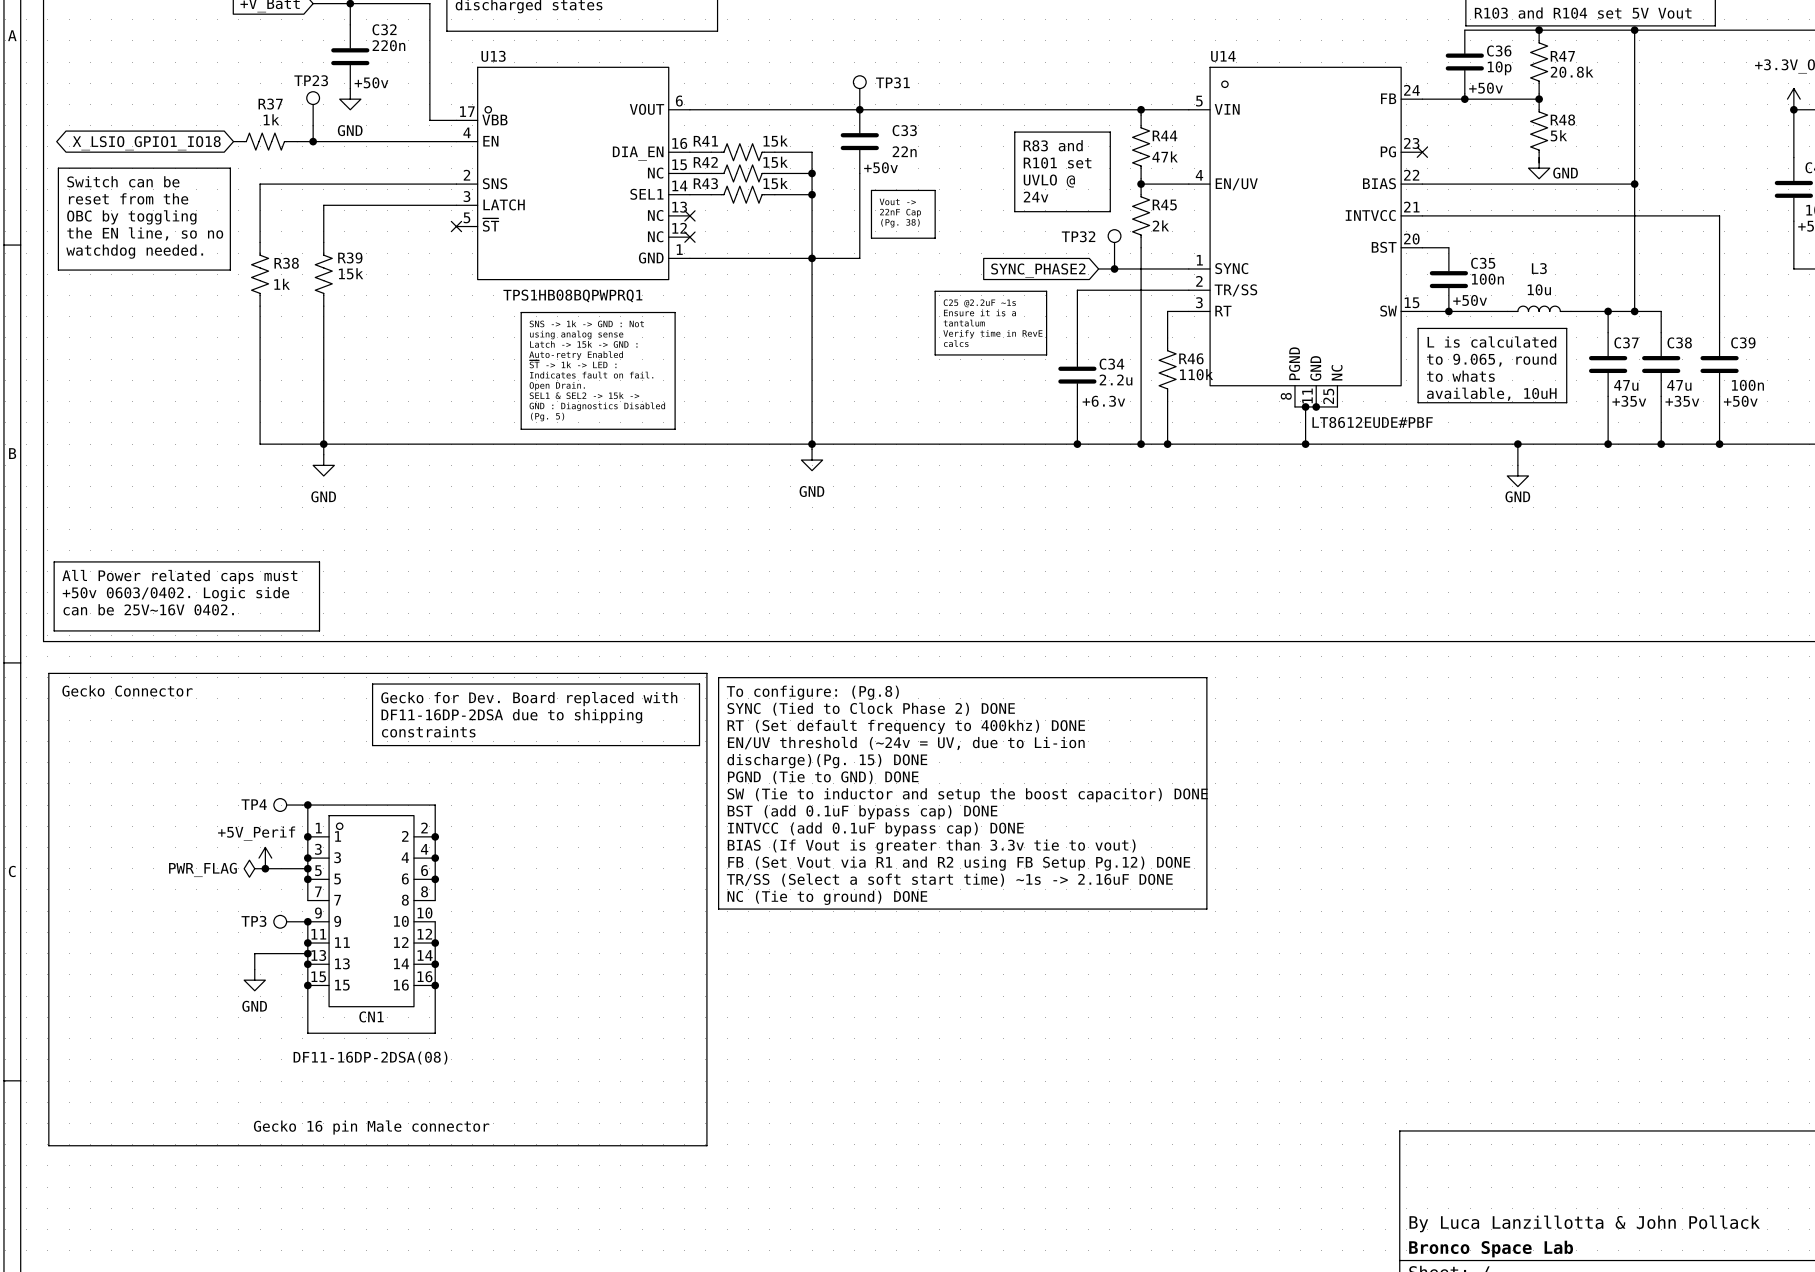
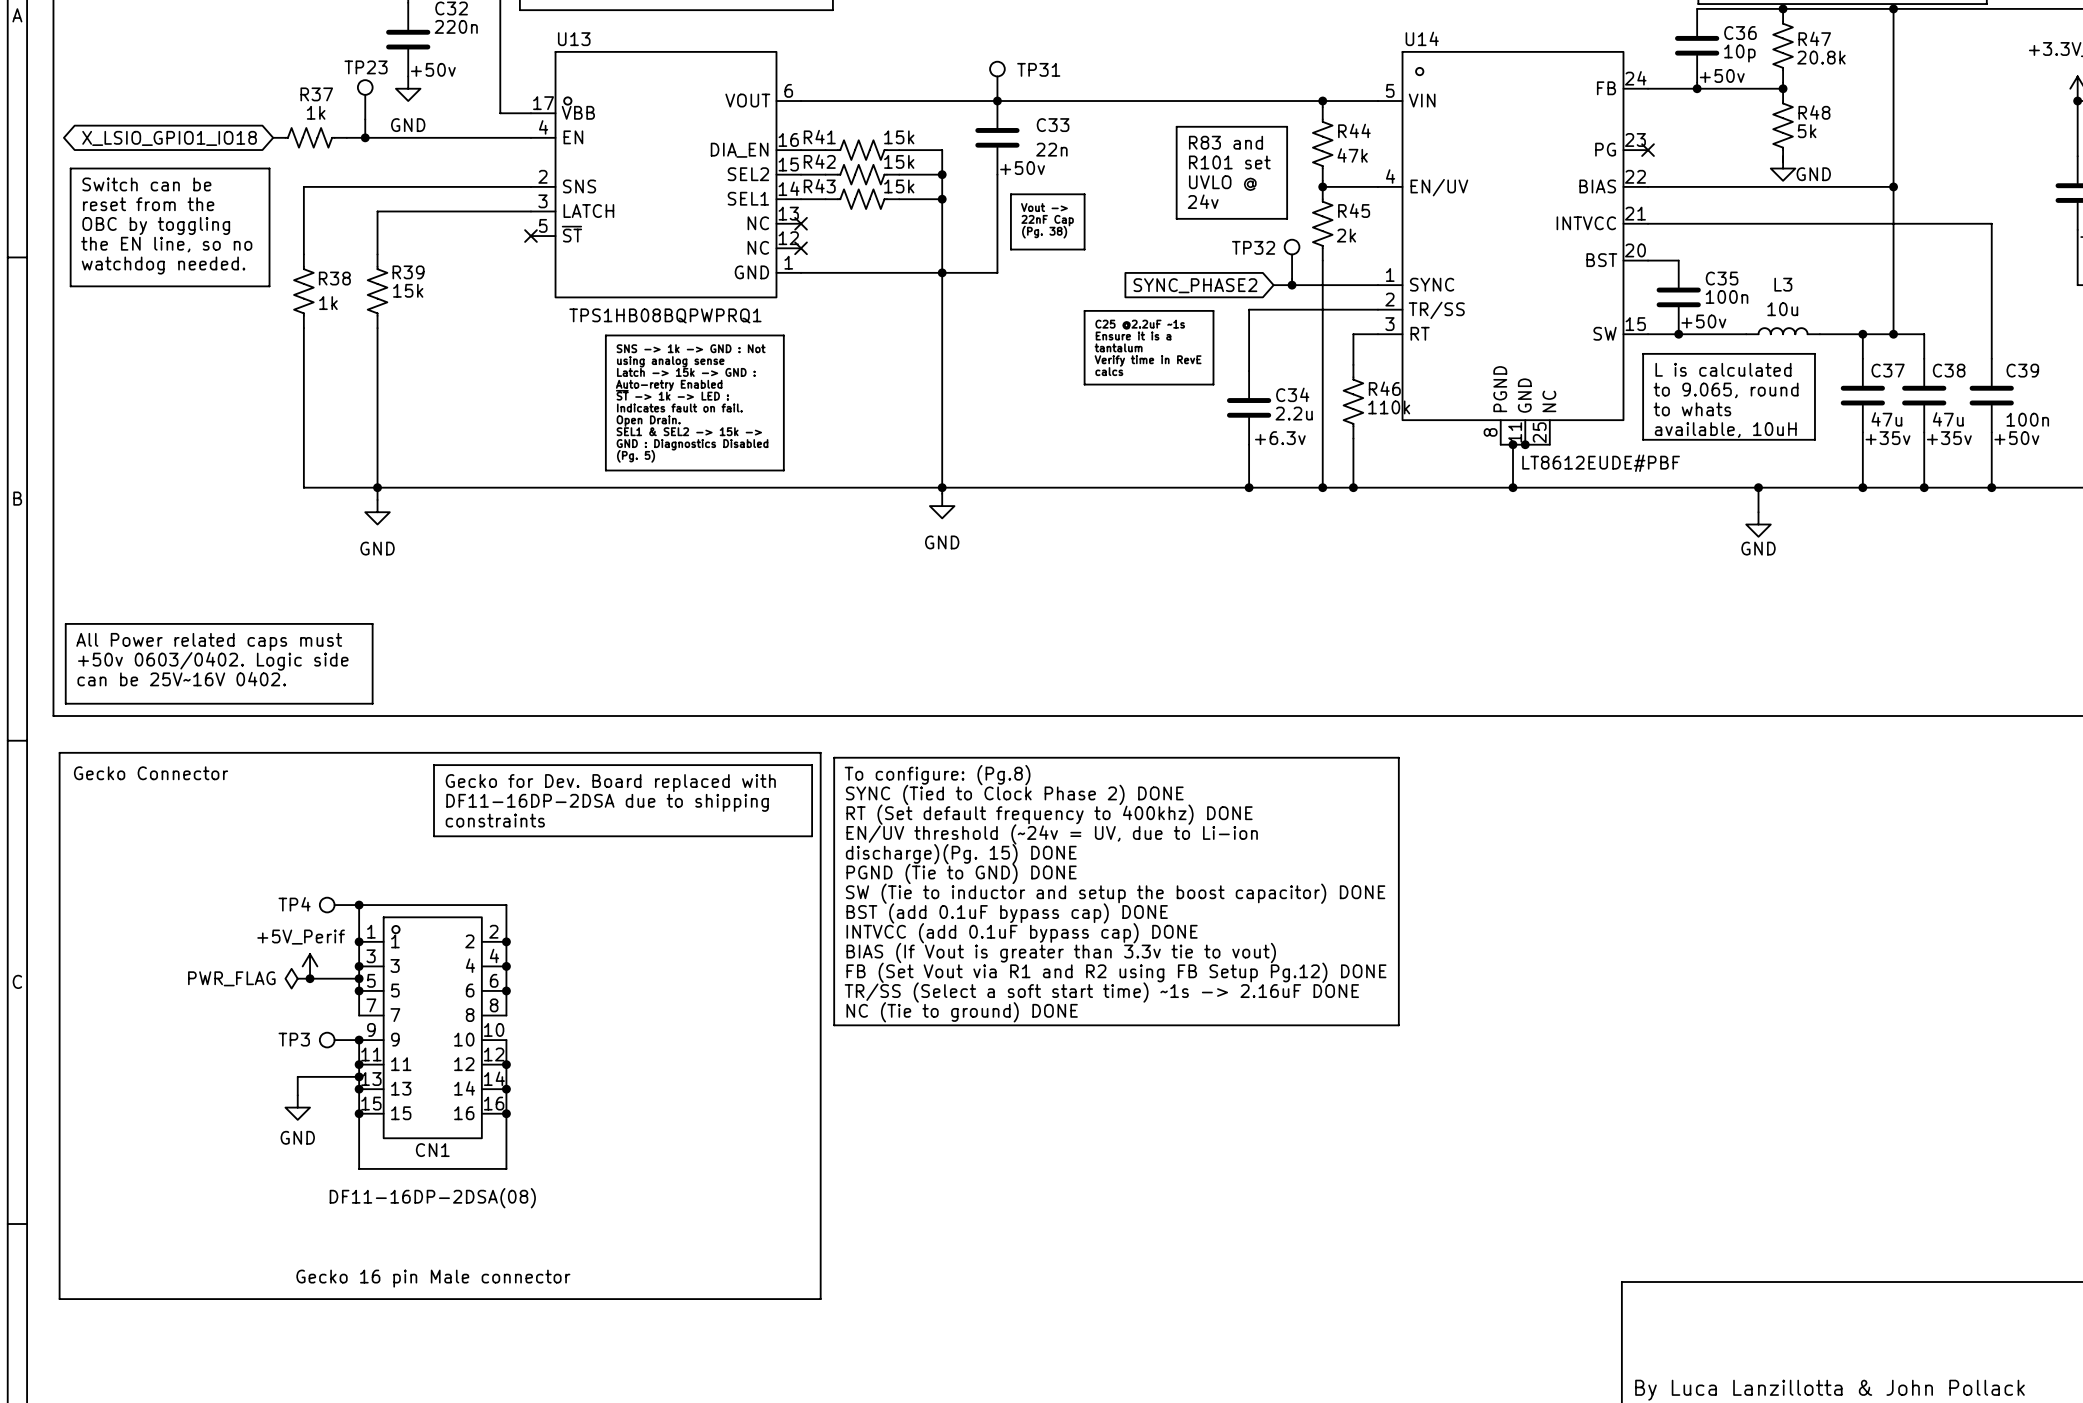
U13 pin name: NC (655, 173) -> SEL2 (748, 174)

